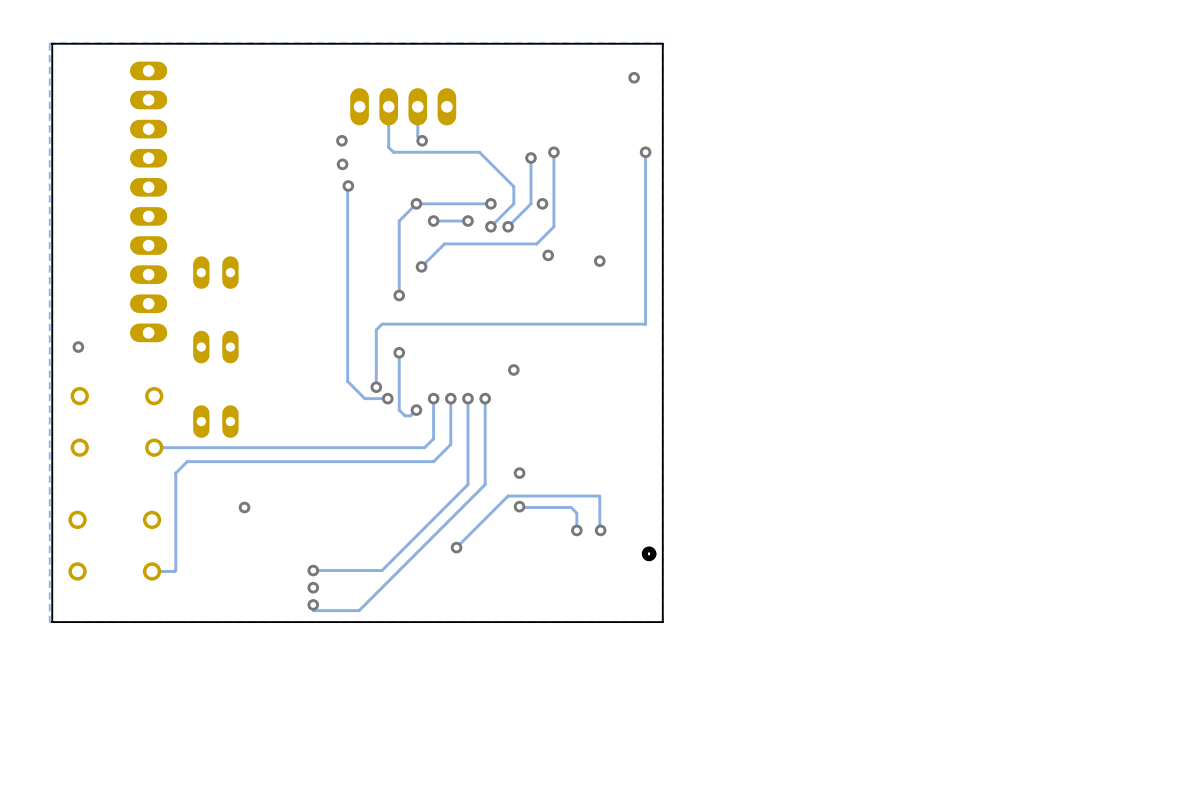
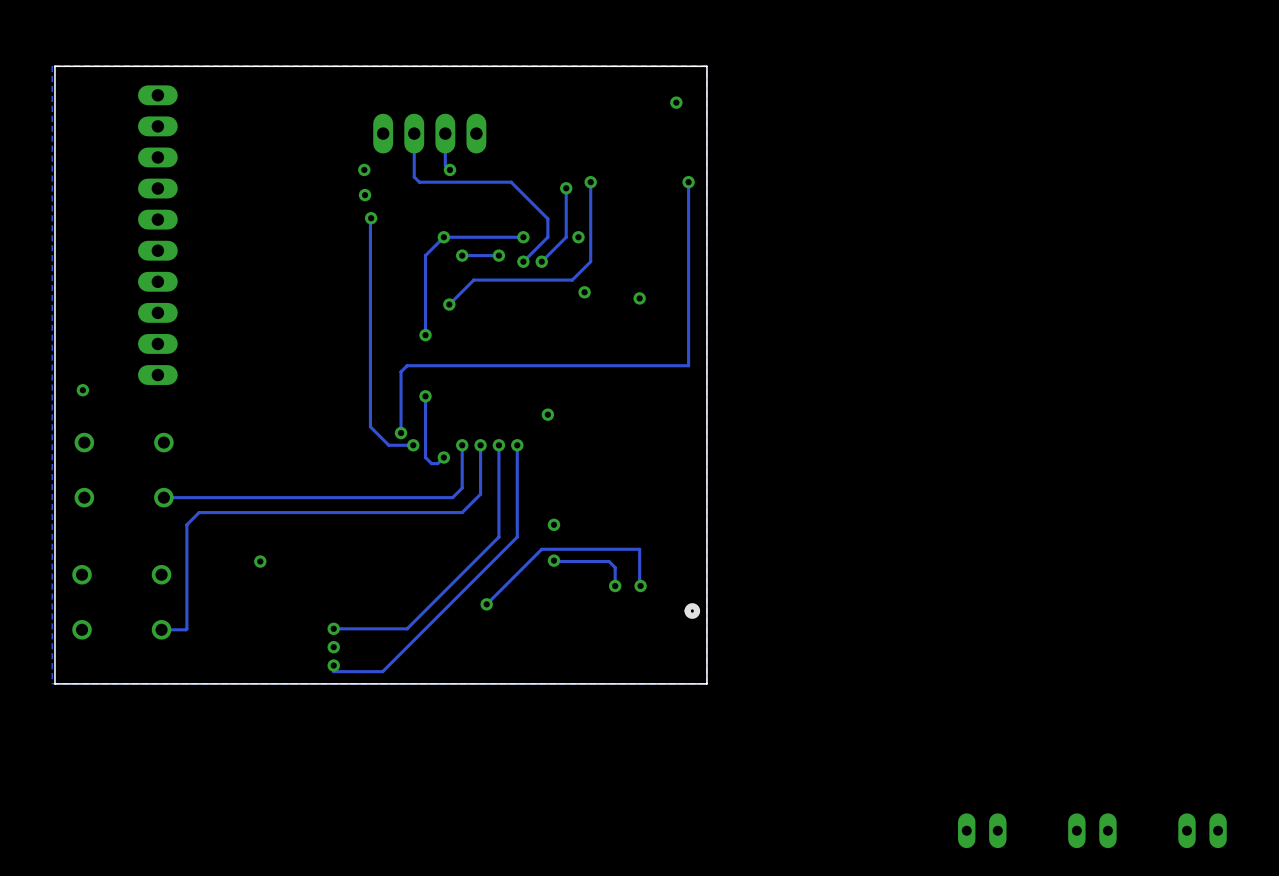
part: (215, 272) -> none
part: (215, 347) -> none
part: (215, 421) -> none
part: none -> (982, 830)
part: none -> (1092, 830)
part: none -> (1202, 830)

